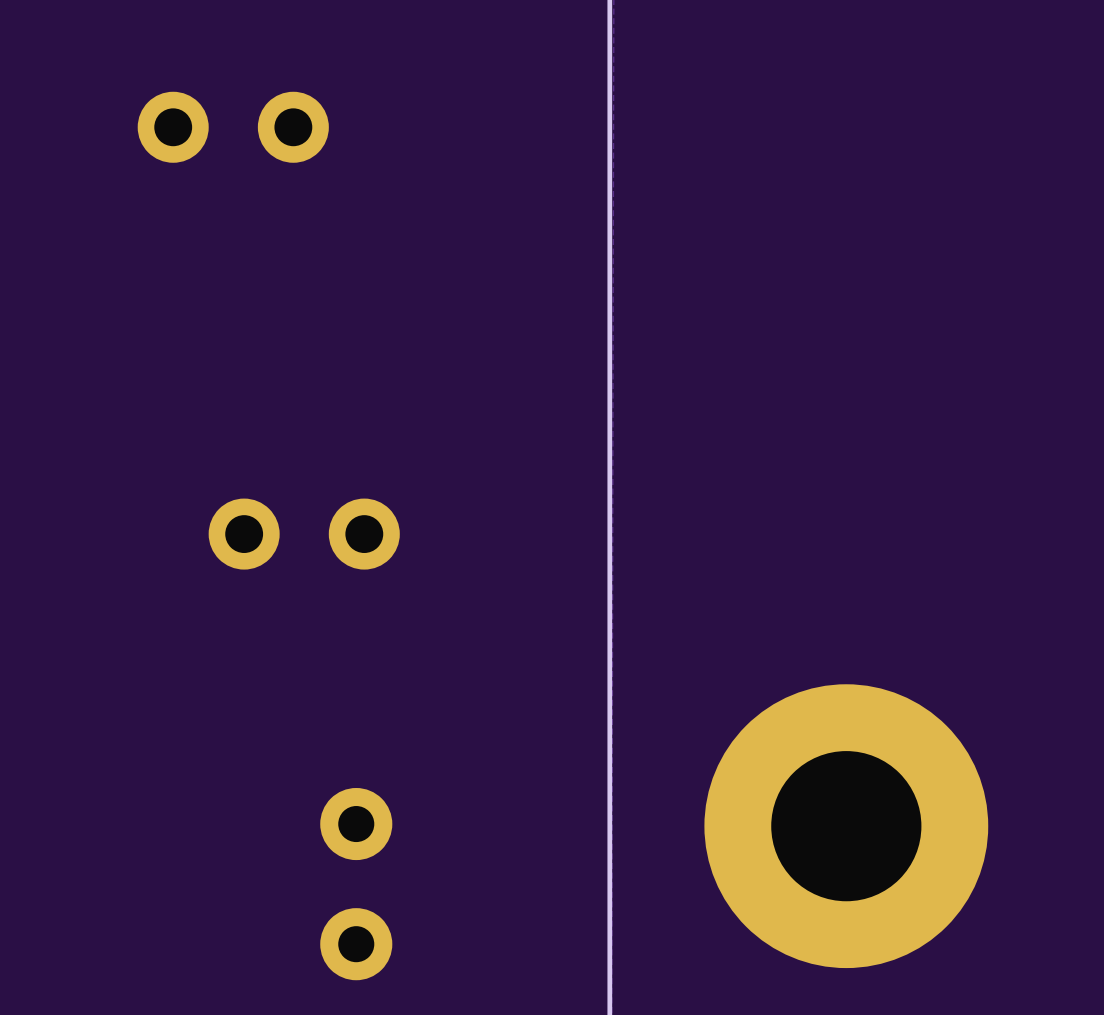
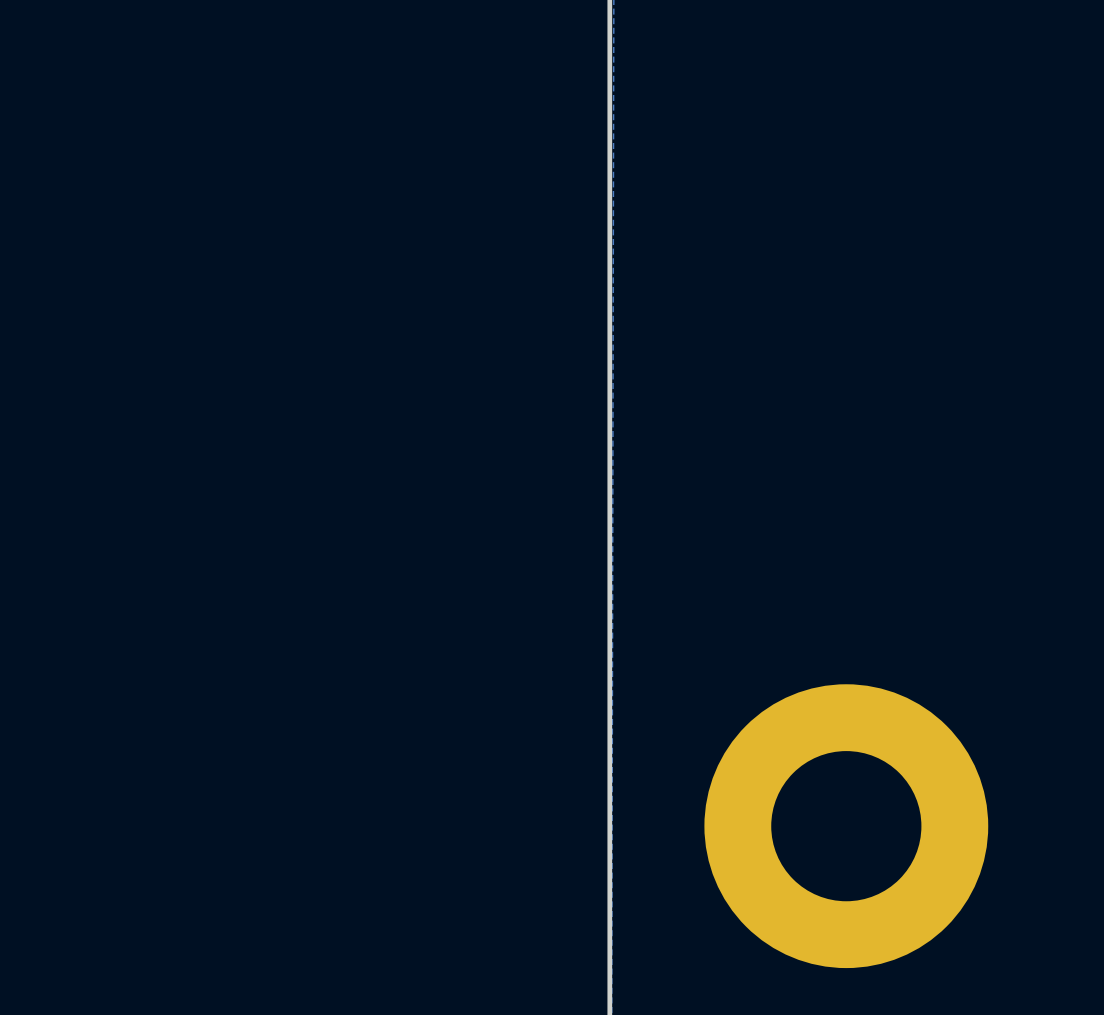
part: (233, 127) -> none
part: (304, 534) -> none
part: (356, 884) -> none

